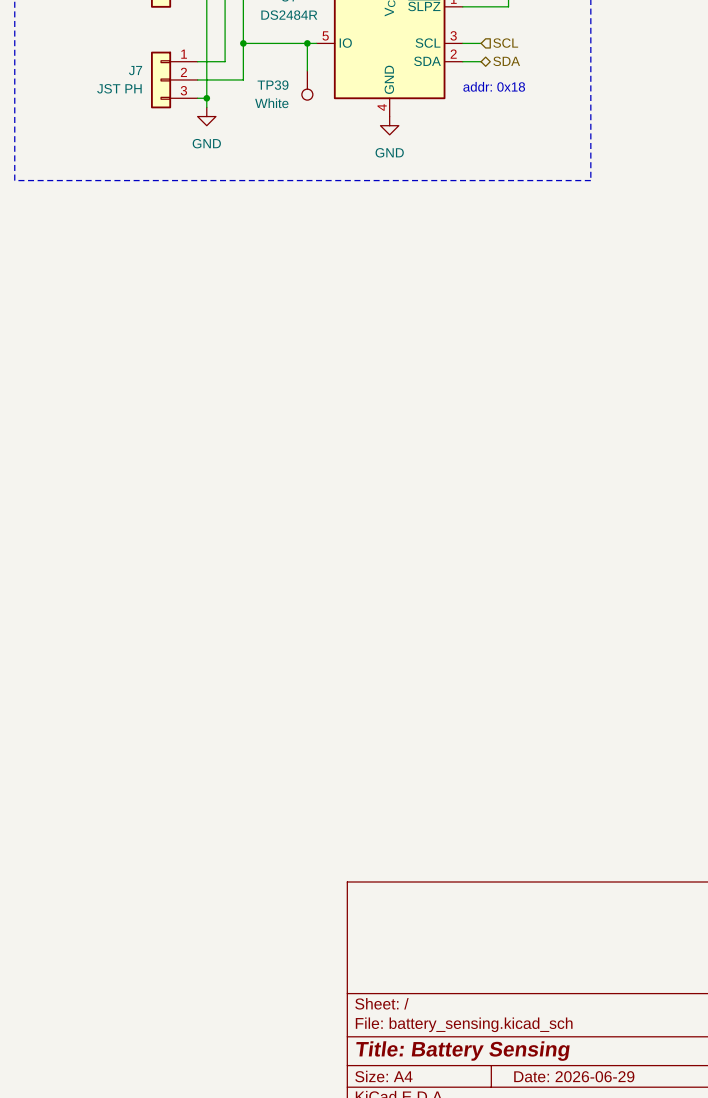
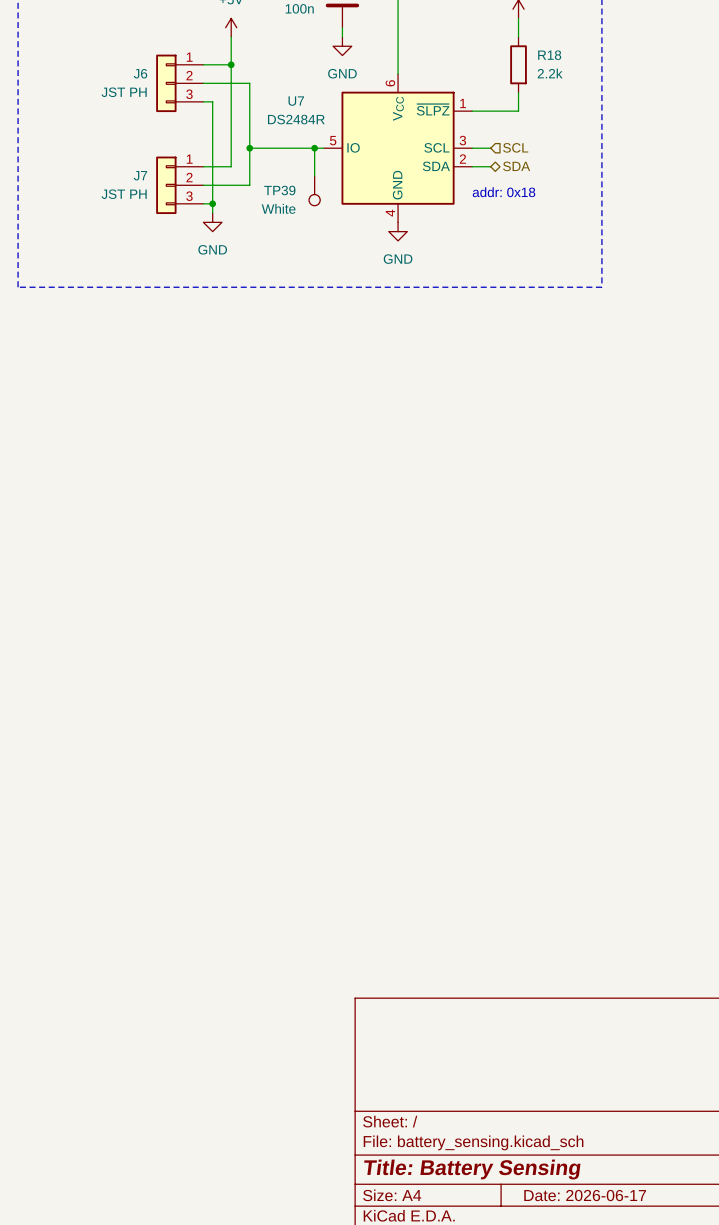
title block: Date: 2026-06-29 (574, 1076) -> Date: 2026-06-17 (585, 1195)

